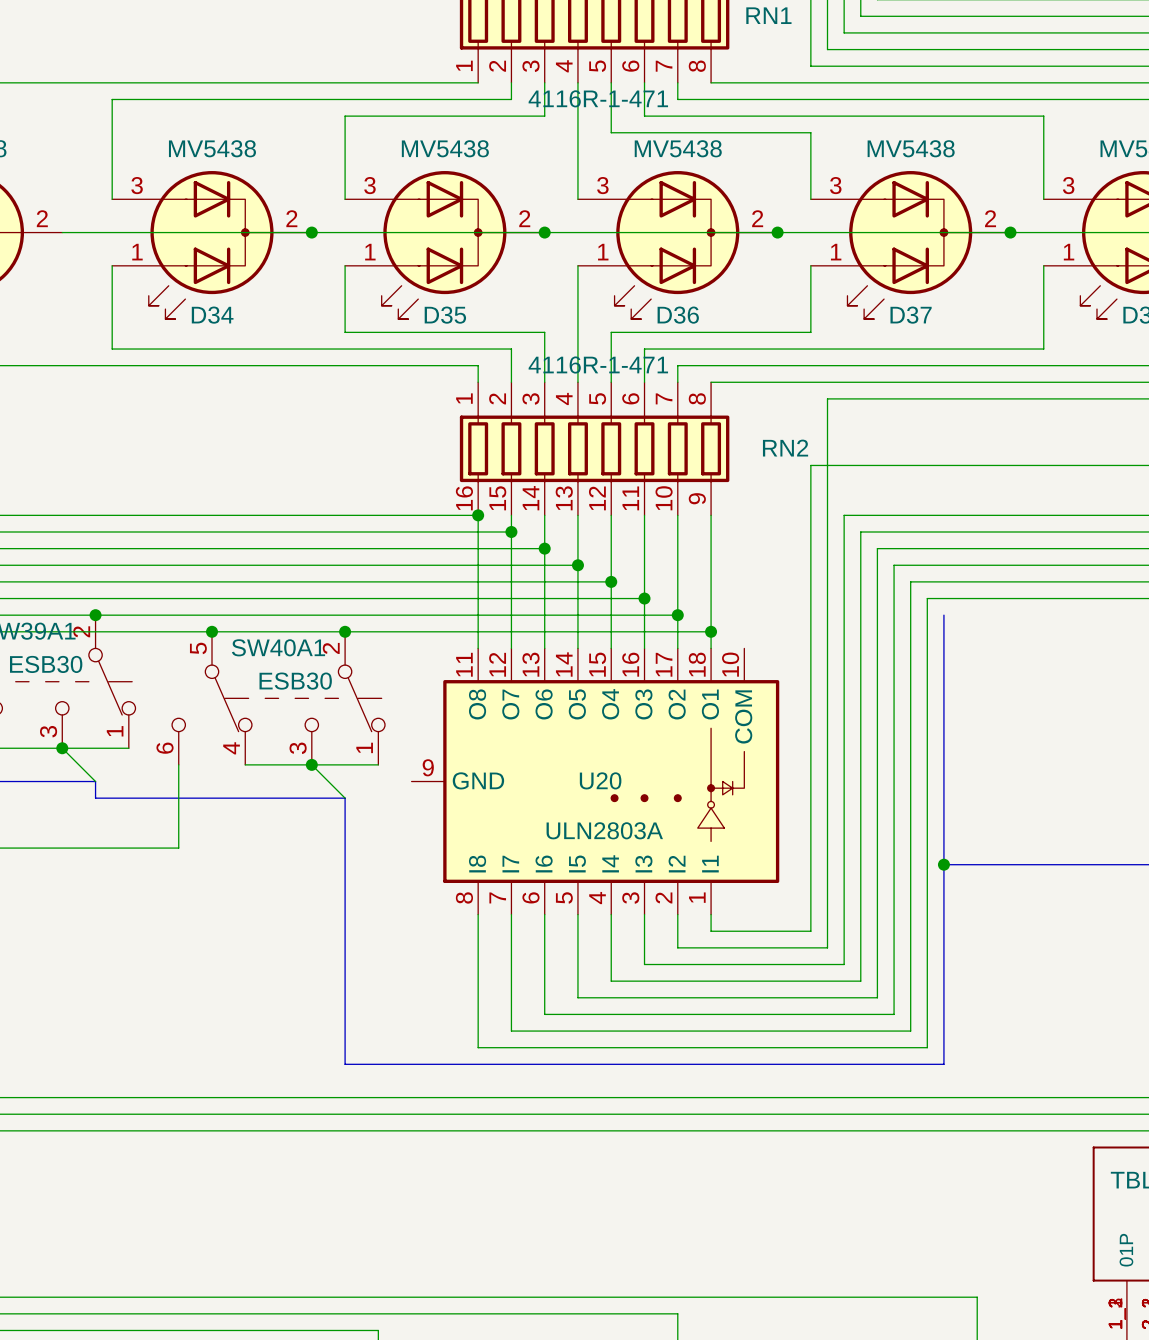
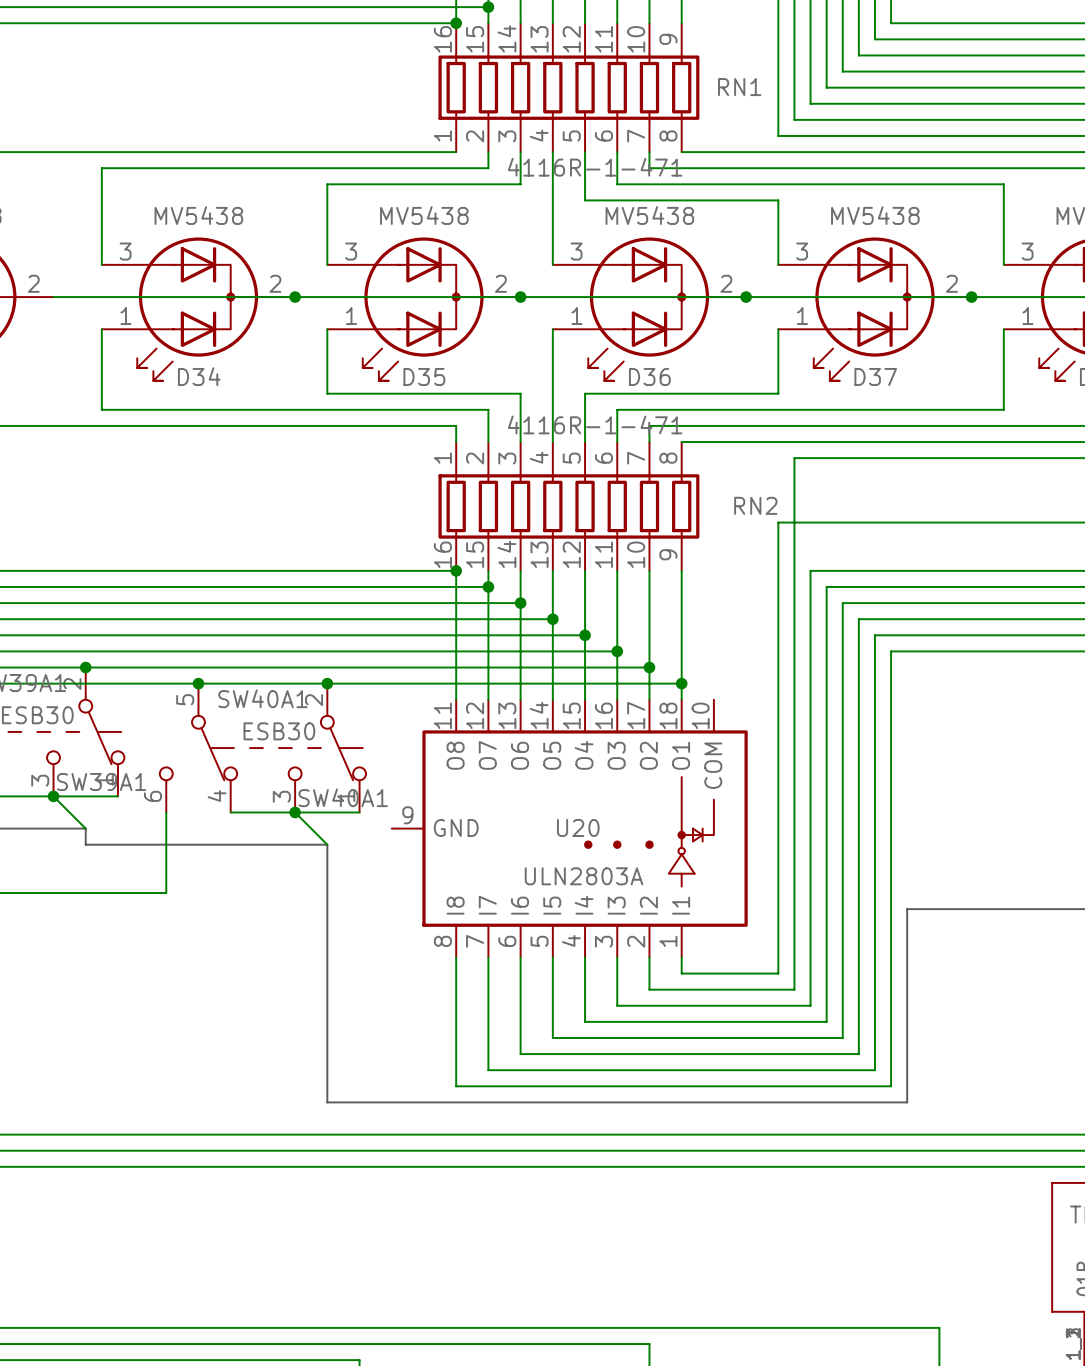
bus: (943, 615) (943, 864) -> none
label: none -> SW39A1 (101, 782)
label: none -> SW40A1 (343, 797)
junction: (943, 864) -> none

